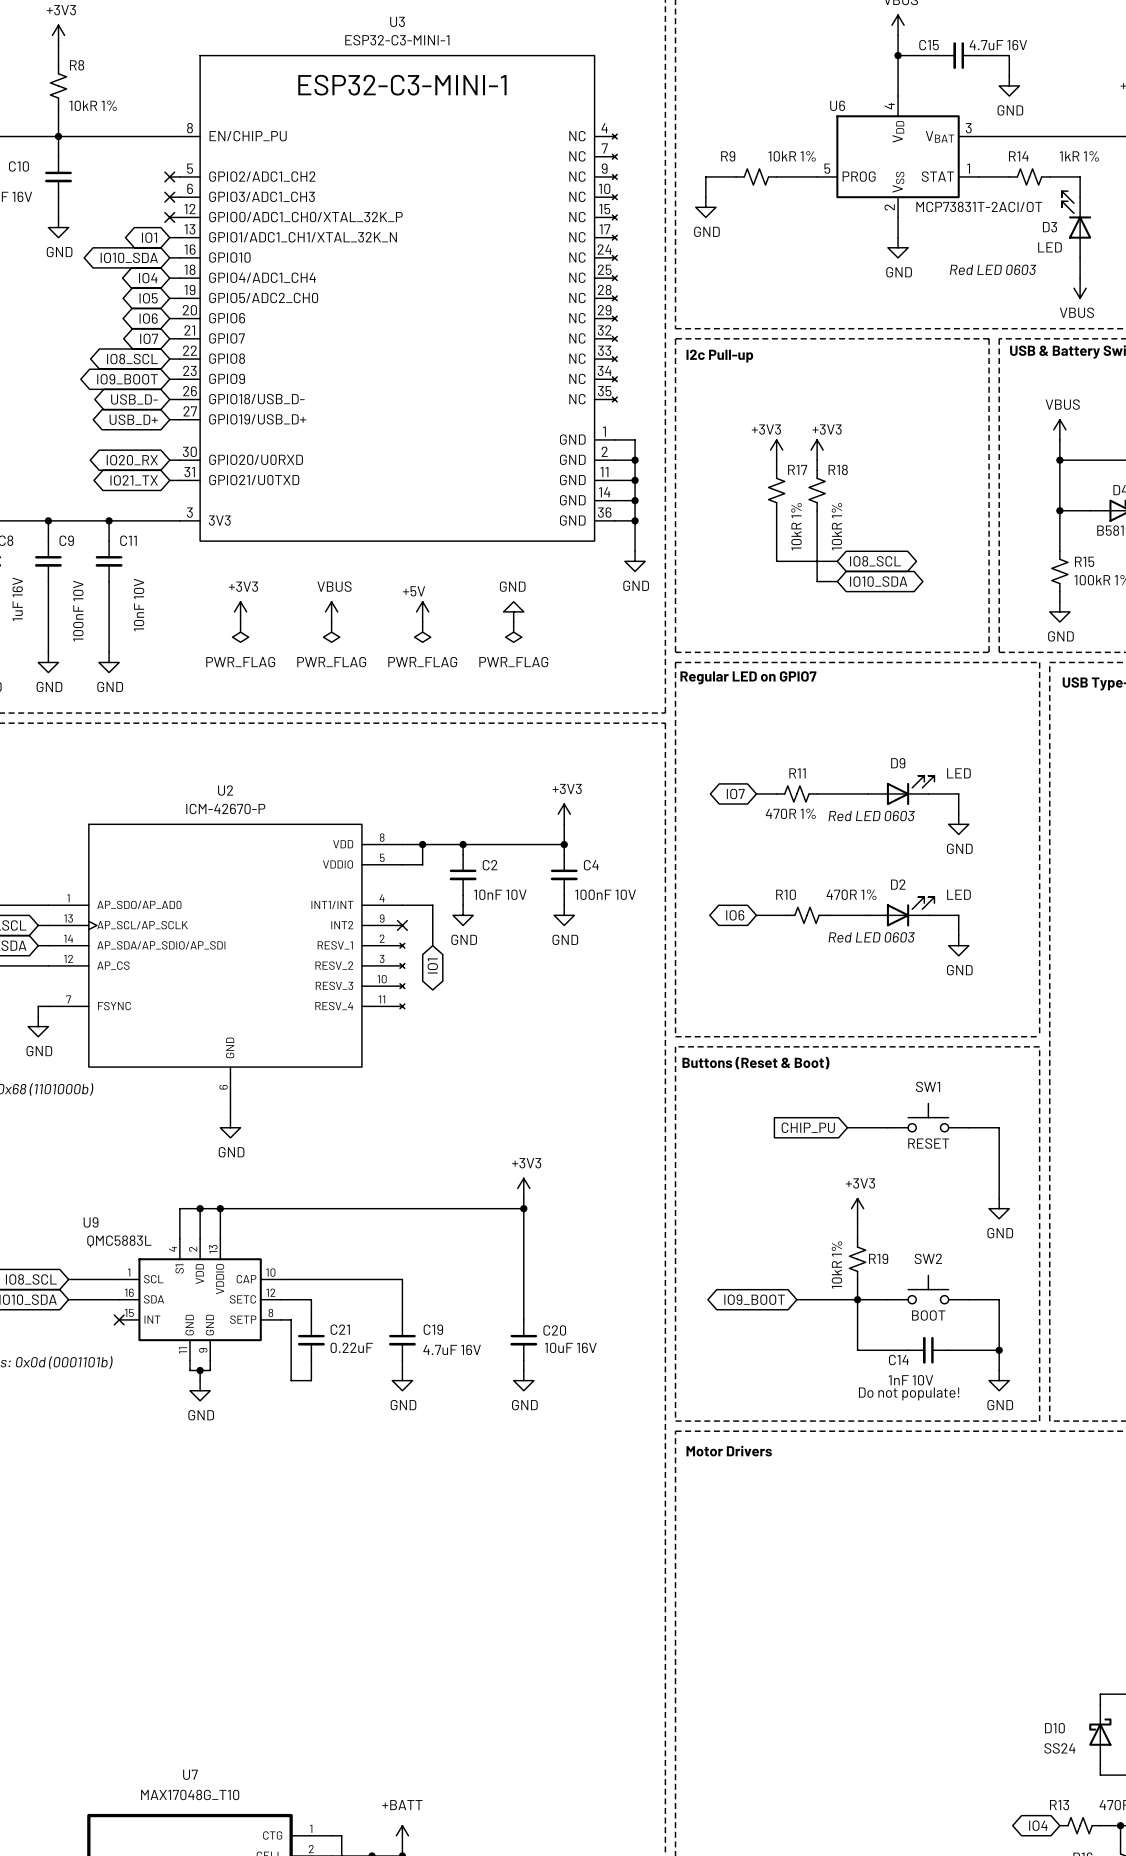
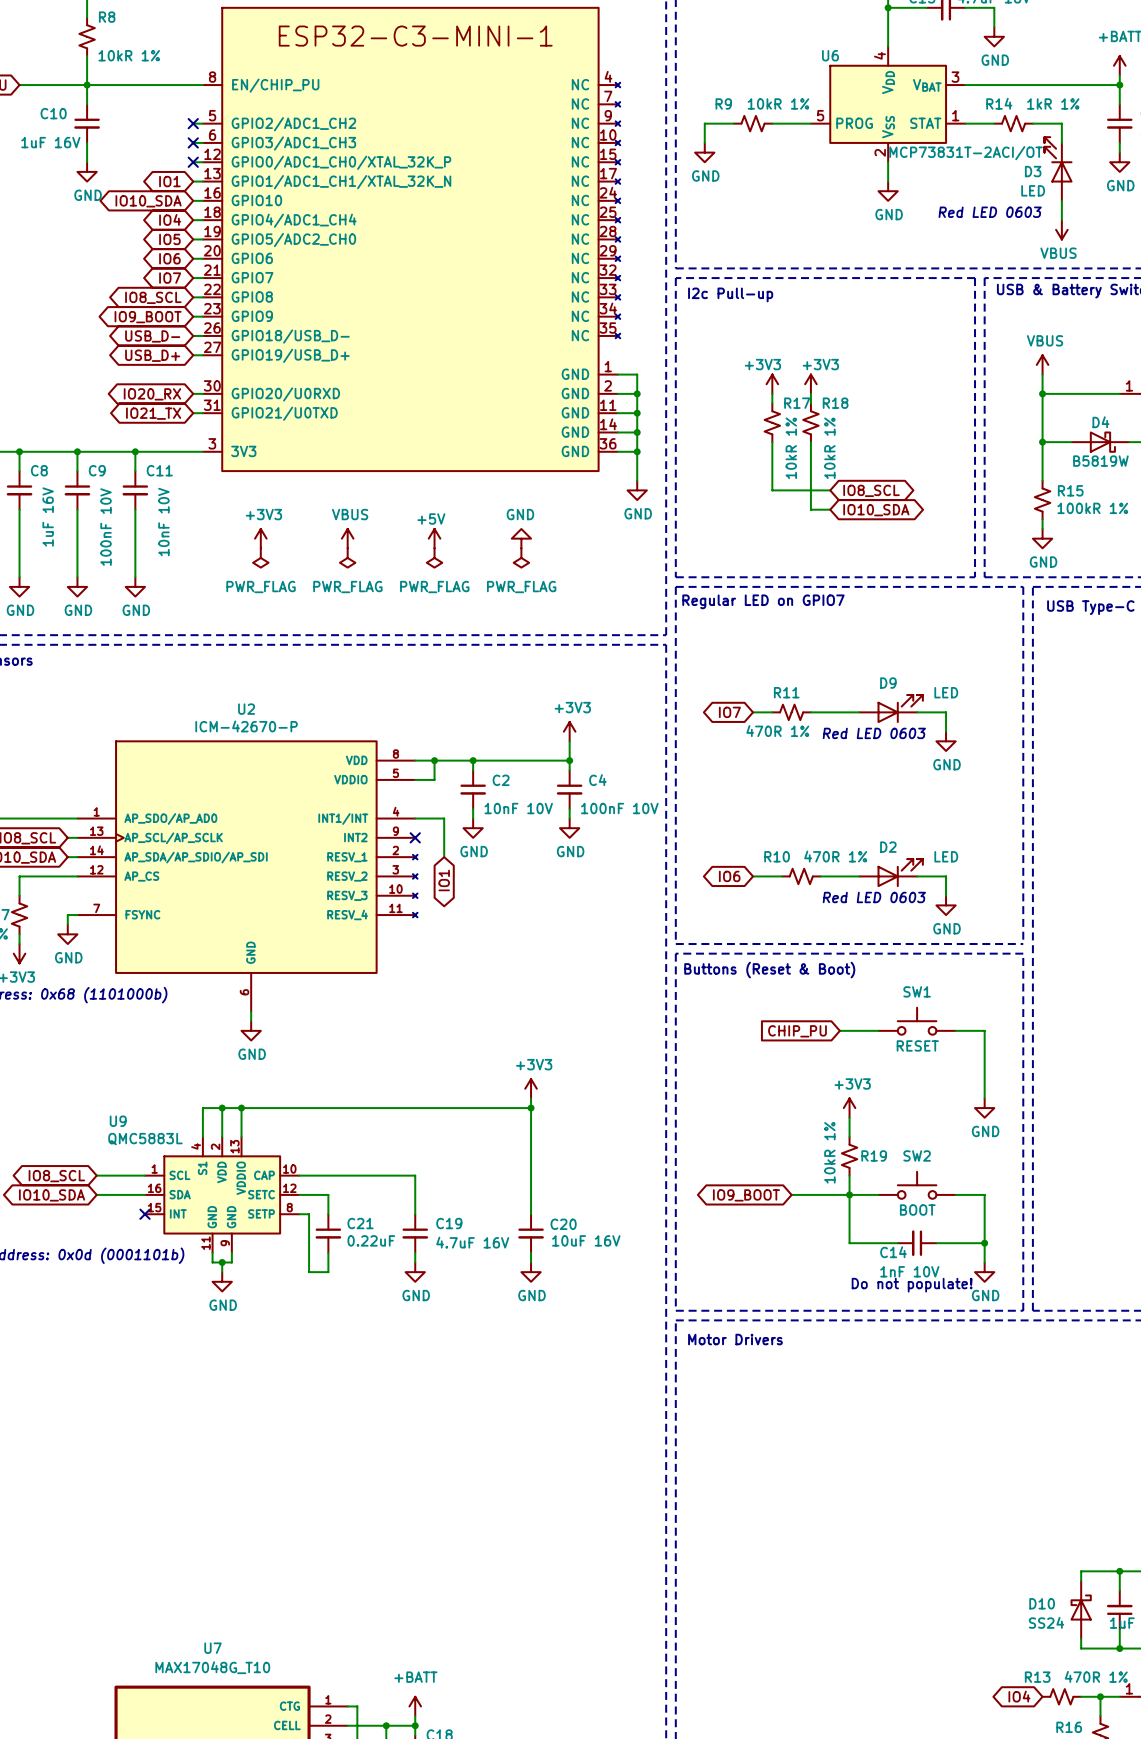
D2 position: (901, 911) -> (891, 873)
global label position: IO6 (735, 915) -> IO6 (729, 876)
wire: (756, 915) (786, 915) -> (753, 876) (781, 876)
R10 position: (807, 915) -> (801, 876)
wire: (827, 915) (867, 915) -> (820, 876) (859, 876)
wire: (928, 915) (958, 915) (958, 935) -> (917, 876) (946, 876) (946, 895)
text position: Red LED 0603 (871, 937) -> Red LED 0603 (874, 897)
power symbol position: GND (958, 945) -> GND (946, 905)

